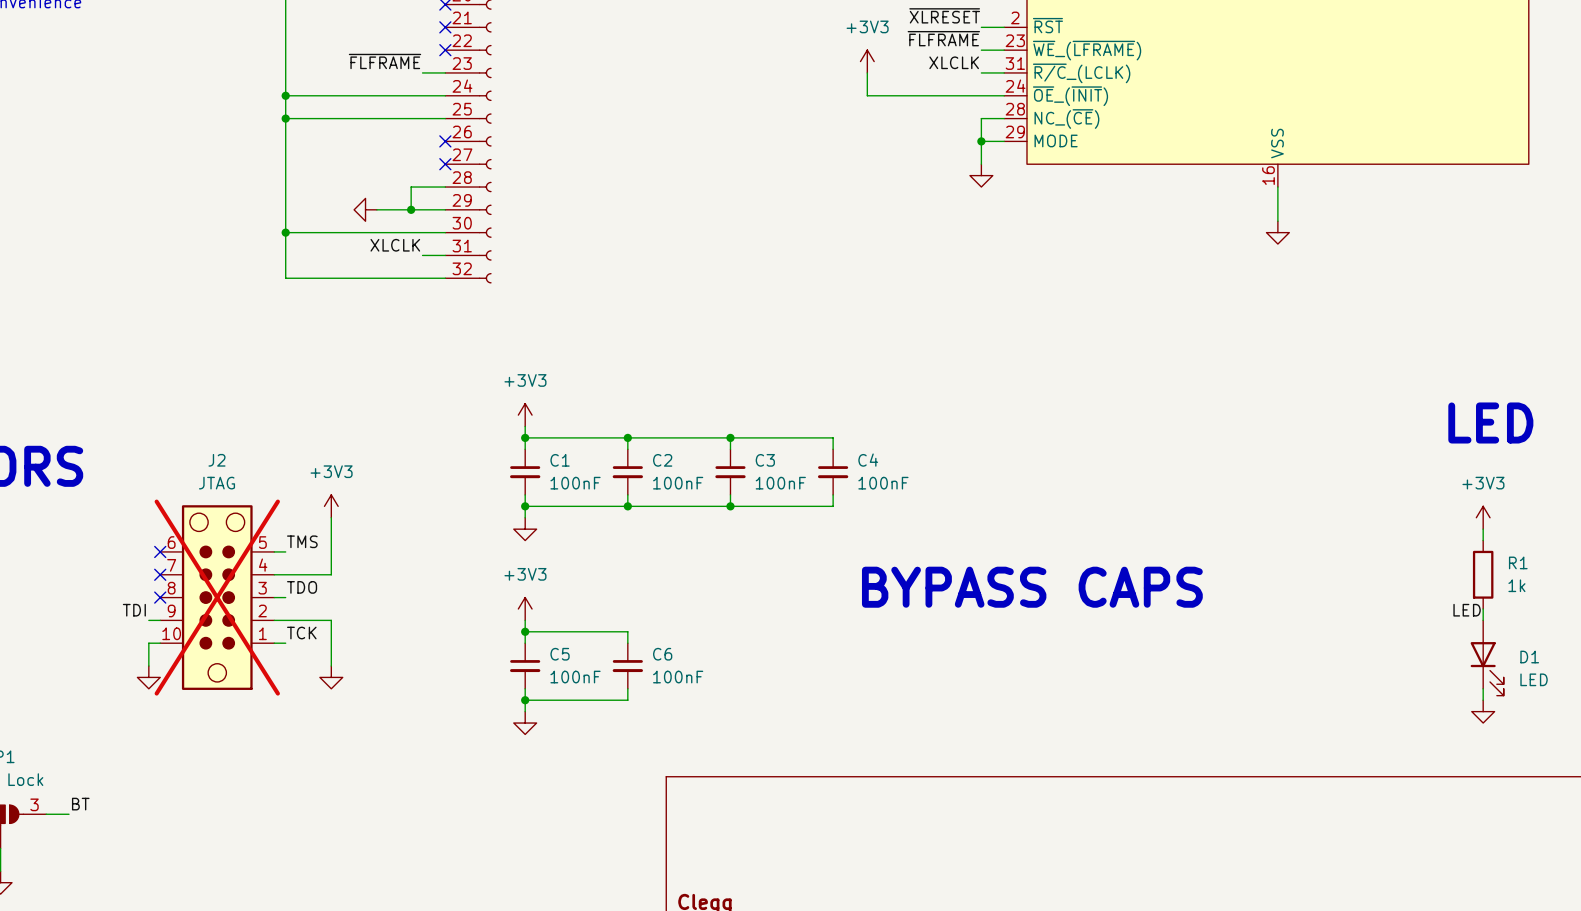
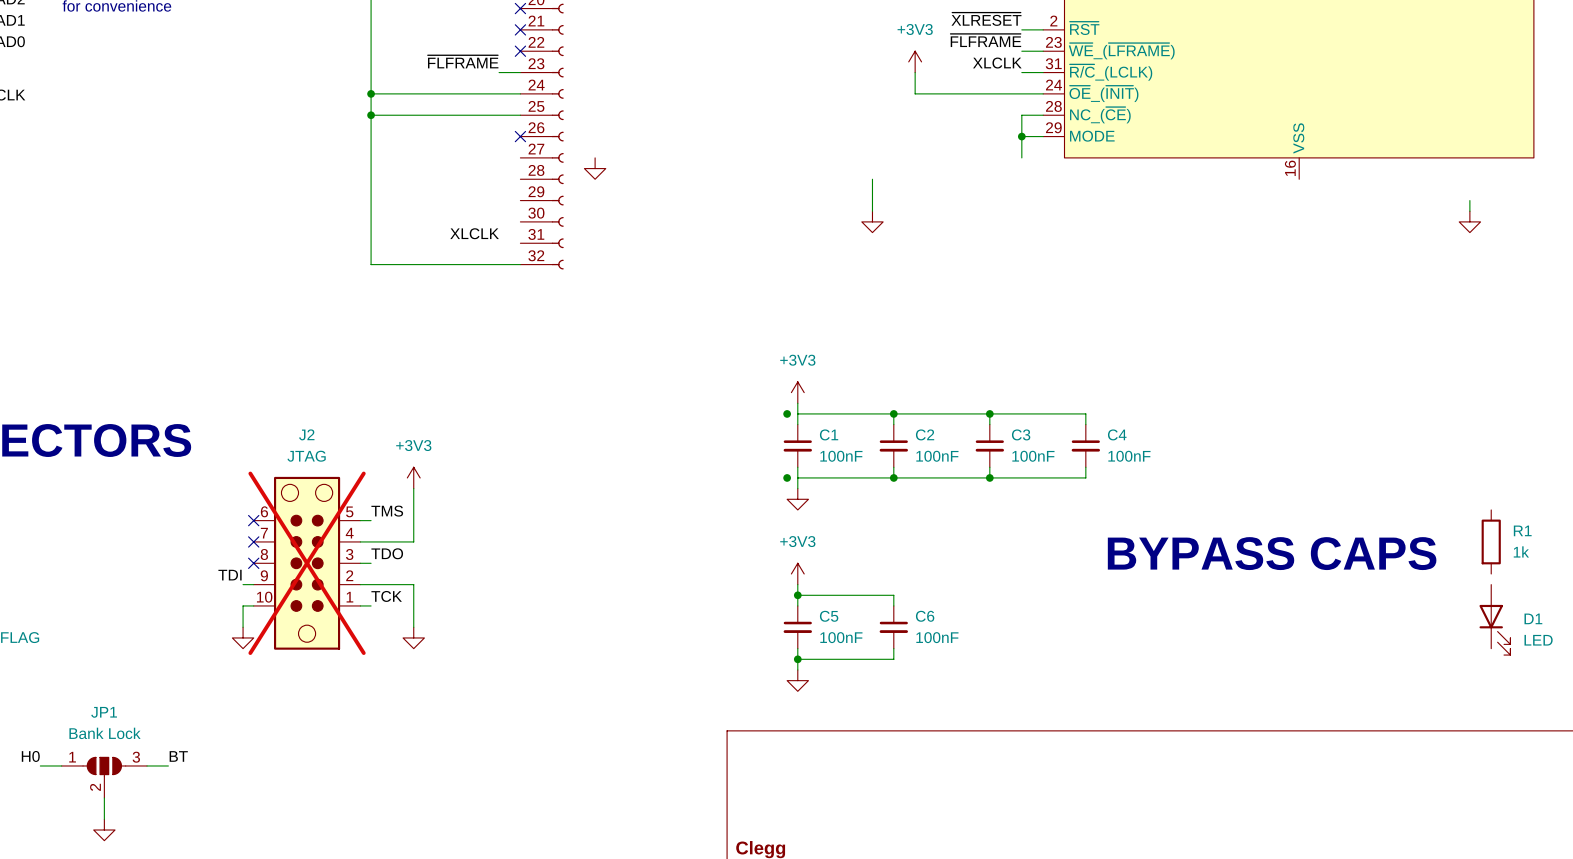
no-connect mark: (445, 164) -> none
power symbol: none -> (595, 168)
power symbol position: (981, 175) -> (872, 221)
wire: (445, 187) (411, 187) (411, 209) -> none
wire: none -> (872, 179) (872, 211)
wire: (1277, 187) (1277, 221) -> none
power symbol: (365, 209) -> none
wire: (376, 209) (445, 209) -> none
junction: (411, 209) -> none
wire: none -> (1469, 200) (1469, 211)
wire: (285, 232) (445, 232) -> none
junction: (285, 232) -> none
power symbol position: (1277, 232) -> (1469, 221)
wire: (422, 255) (445, 255) -> none
power symbol: +3V3 (525, 415) -> none
power symbol: none -> +3V3 (797, 392)
text: LED (1490, 422) -> none
wire: (525, 426) (525, 449) -> (797, 403) (797, 424)
wire: (525, 437) (741, 437) -> none
junction: (525, 437) -> none
wire: (627, 437) (627, 449) -> (893, 413) (893, 424)
junction: (627, 437) -> none
wire: (730, 437) (730, 449) -> (989, 413) (989, 424)
wire: (833, 437) (833, 449) -> (883, 413) (1085, 413) (1085, 424)
junction: none -> (893, 413)
junction: none -> (989, 413)
C1 position: (525, 472) -> (797, 445)
C2 position: (627, 472) -> (893, 445)
C3 position: (730, 472) -> (989, 445)
C4 position: (833, 472) -> (1085, 445)
wire: (525, 494) (525, 517) -> (797, 467) (797, 488)
wire: (627, 494) (627, 506) -> (893, 467) (893, 477)
wire: (730, 494) (730, 506) -> (989, 467) (989, 477)
wire: (833, 494) (833, 506) -> (1085, 467) (1085, 477) (883, 477)
wire: (525, 506) (741, 506) -> none
junction: (525, 506) -> none
junction: (627, 506) -> none
junction: none -> (893, 477)
junction: none -> (989, 477)
power symbol: +3V3 (1483, 517) -> none
power symbol: (525, 529) -> none
power symbol: none -> (797, 499)
wire: (1483, 529) (1483, 540) -> none
text position: BYPASS CAPS (1032, 587) -> BYPASS CAPS (1272, 553)
power symbol: +3V3 (525, 608) -> none
power symbol: none -> +3V3 (797, 573)
wire: (1483, 608) (1483, 620) -> none
label: LED (1467, 610) -> none
wire: (525, 620) (525, 643) -> (797, 584) (797, 605)
wire: (525, 631) (627, 631) (627, 643) -> (797, 595) (893, 595) (893, 605)
junction: (525, 631) -> none
junction: none -> (797, 595)
C5 position: (525, 666) -> (797, 627)
C6 position: (627, 666) -> (893, 627)
wire: (525, 688) (525, 711) -> (797, 648) (797, 669)
wire: (627, 688) (627, 700) (525, 700) -> (893, 648) (893, 659) (797, 659)
wire: (1483, 688) (1483, 700) -> none
junction: (525, 700) -> none
junction: none -> (797, 659)
power symbol: (1483, 711) -> none
power symbol: (525, 723) -> none
power symbol: none -> (797, 680)

